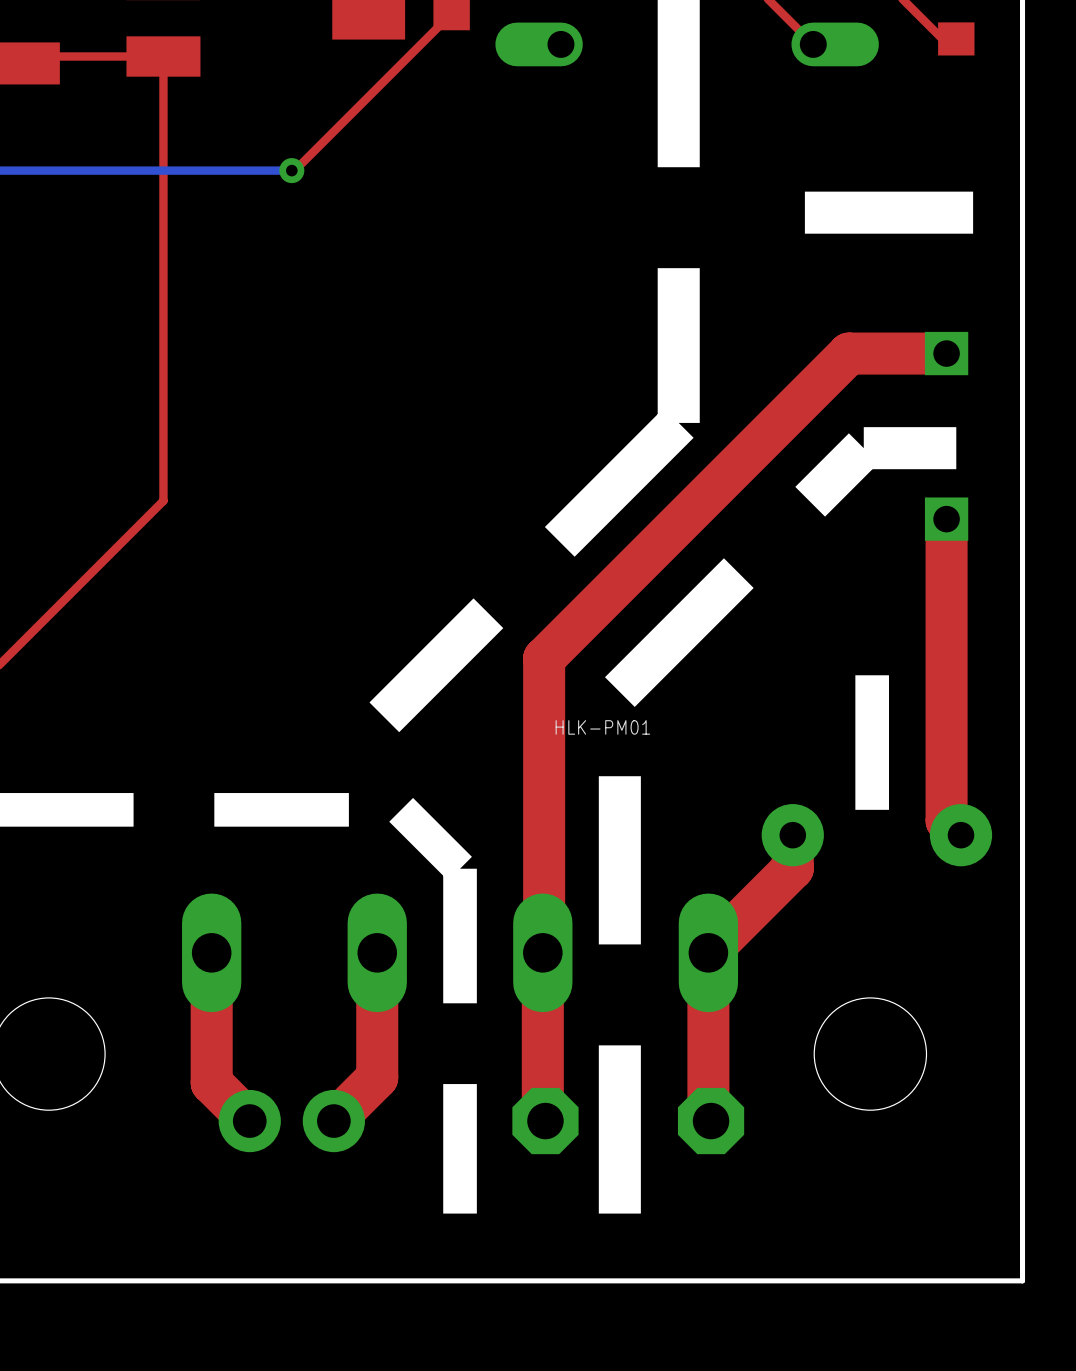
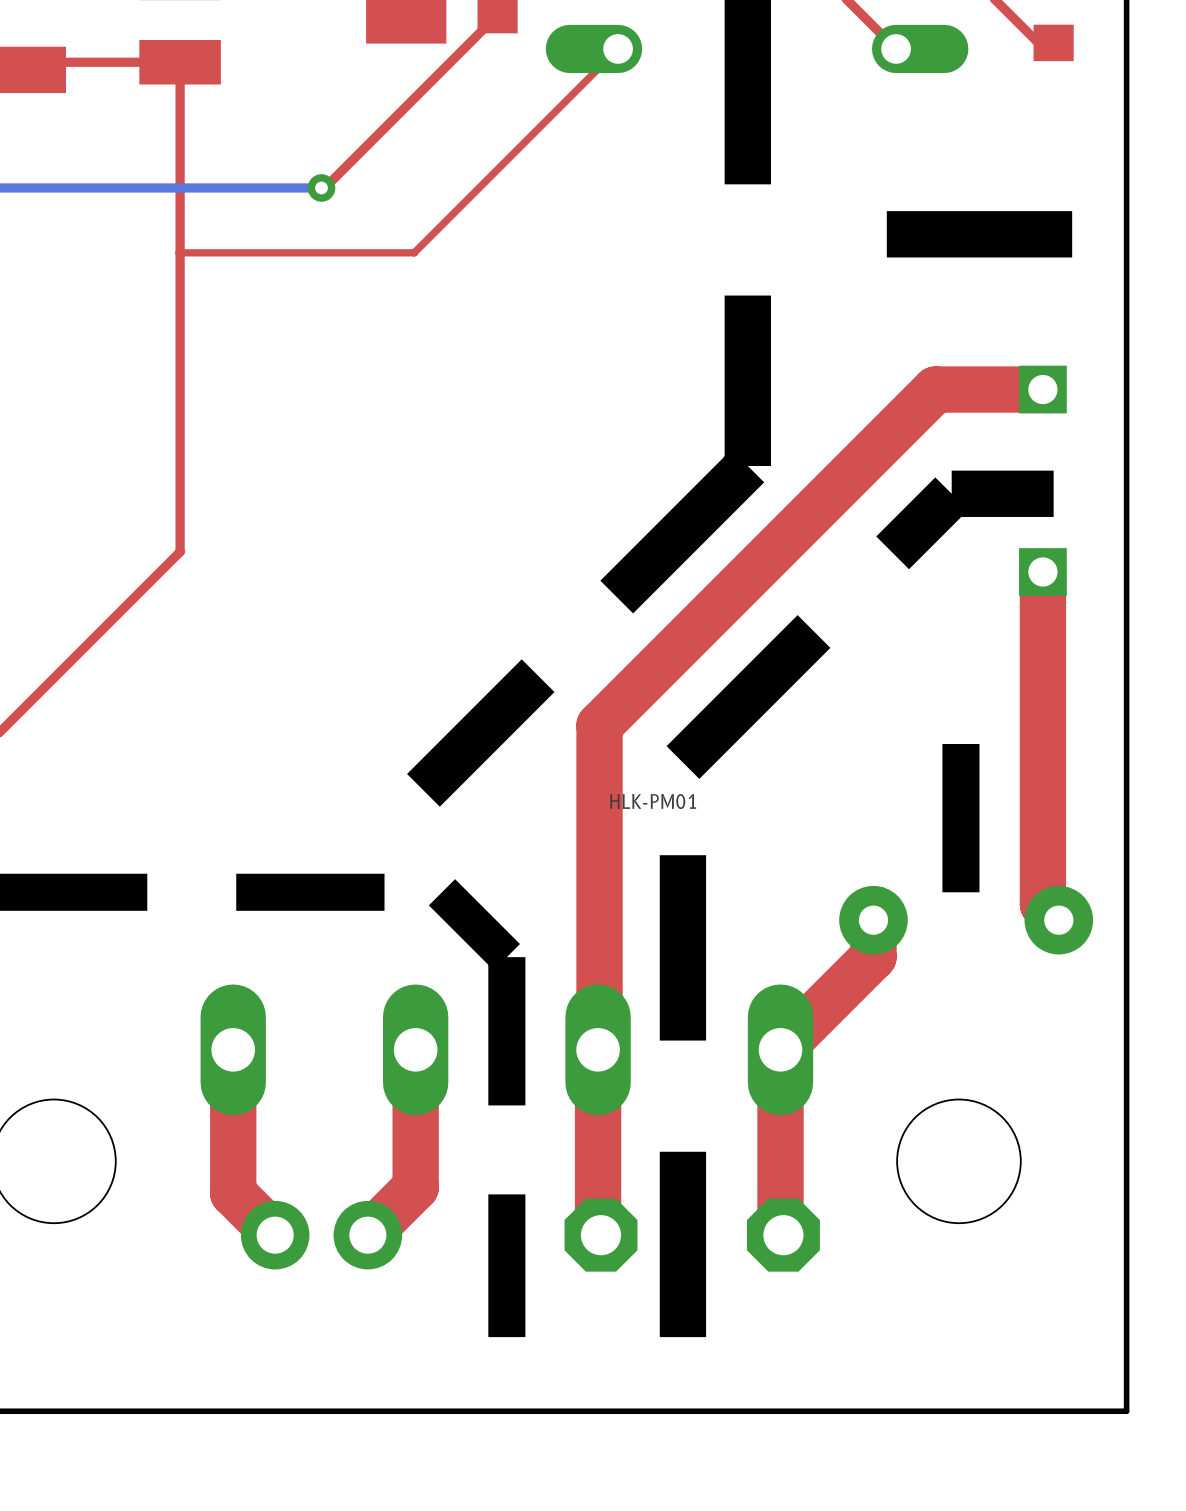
top track: none -> (618, 48) (414, 252) (180, 252)

